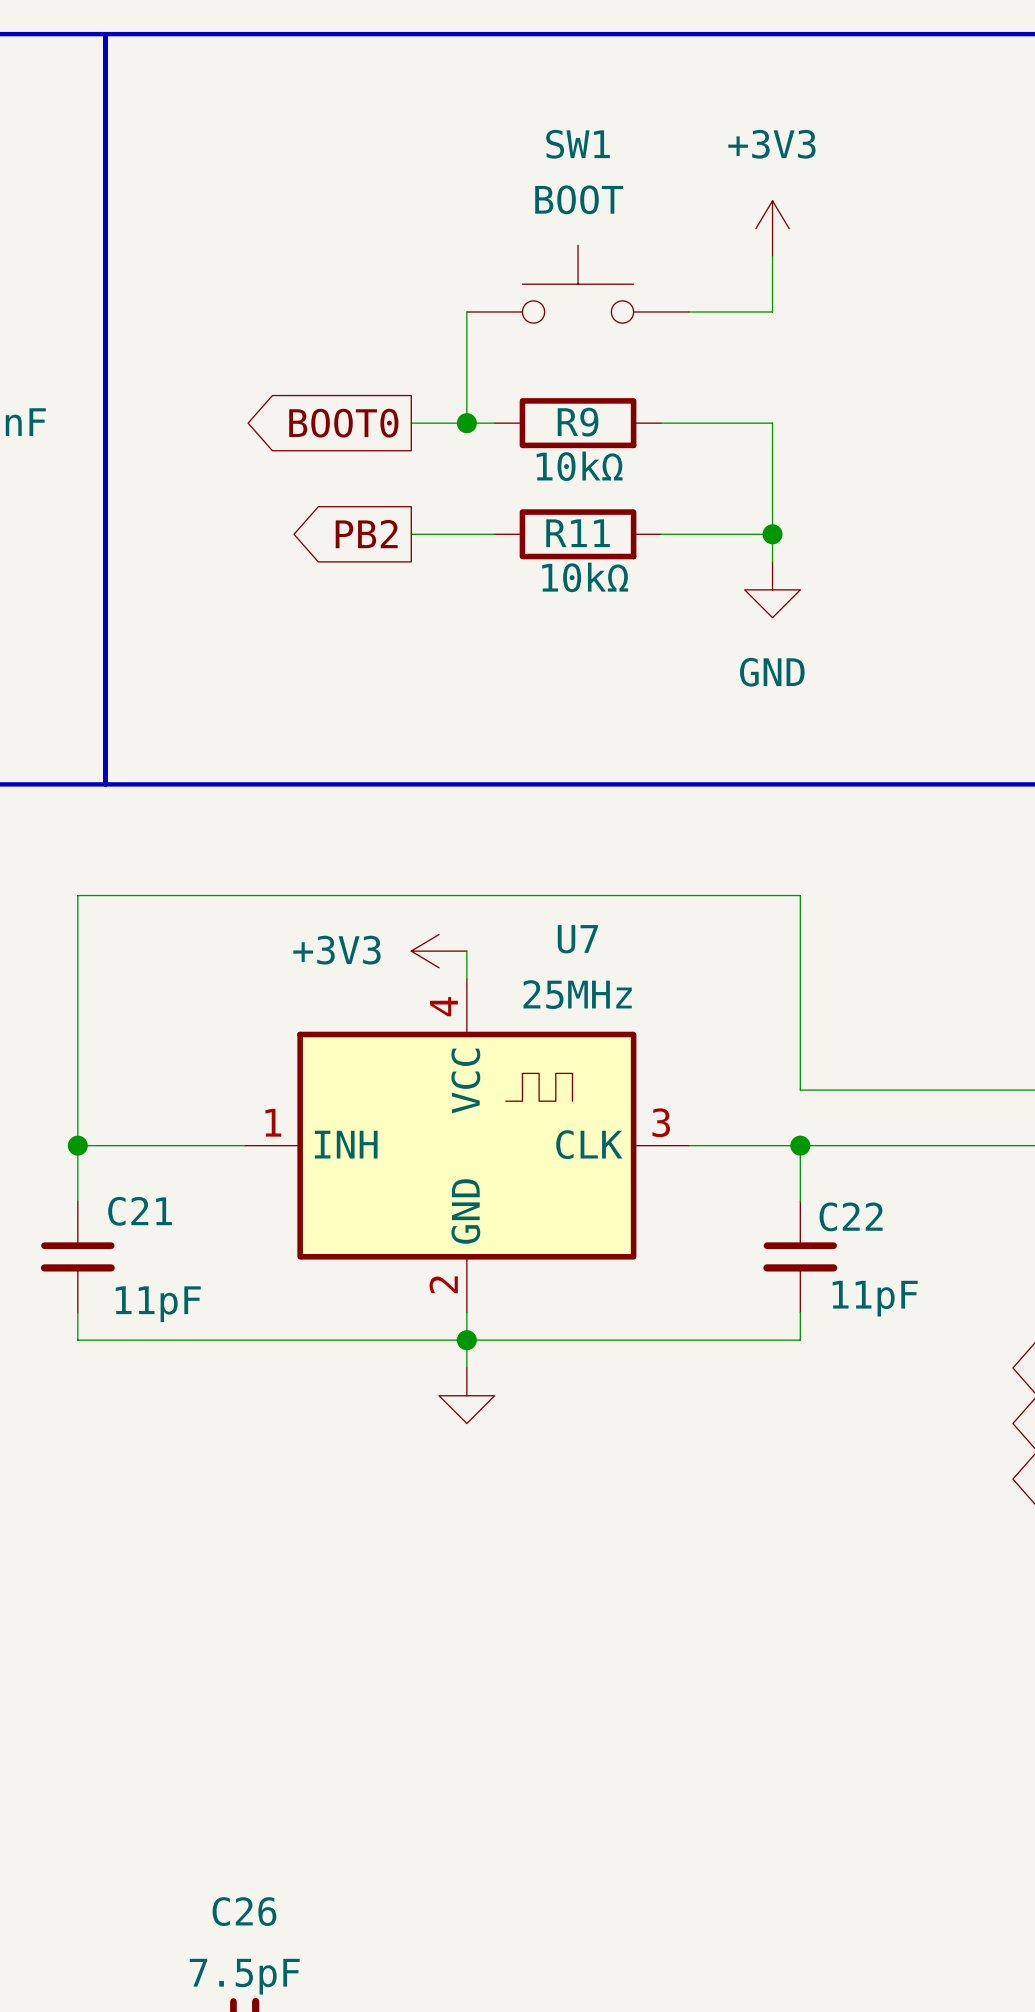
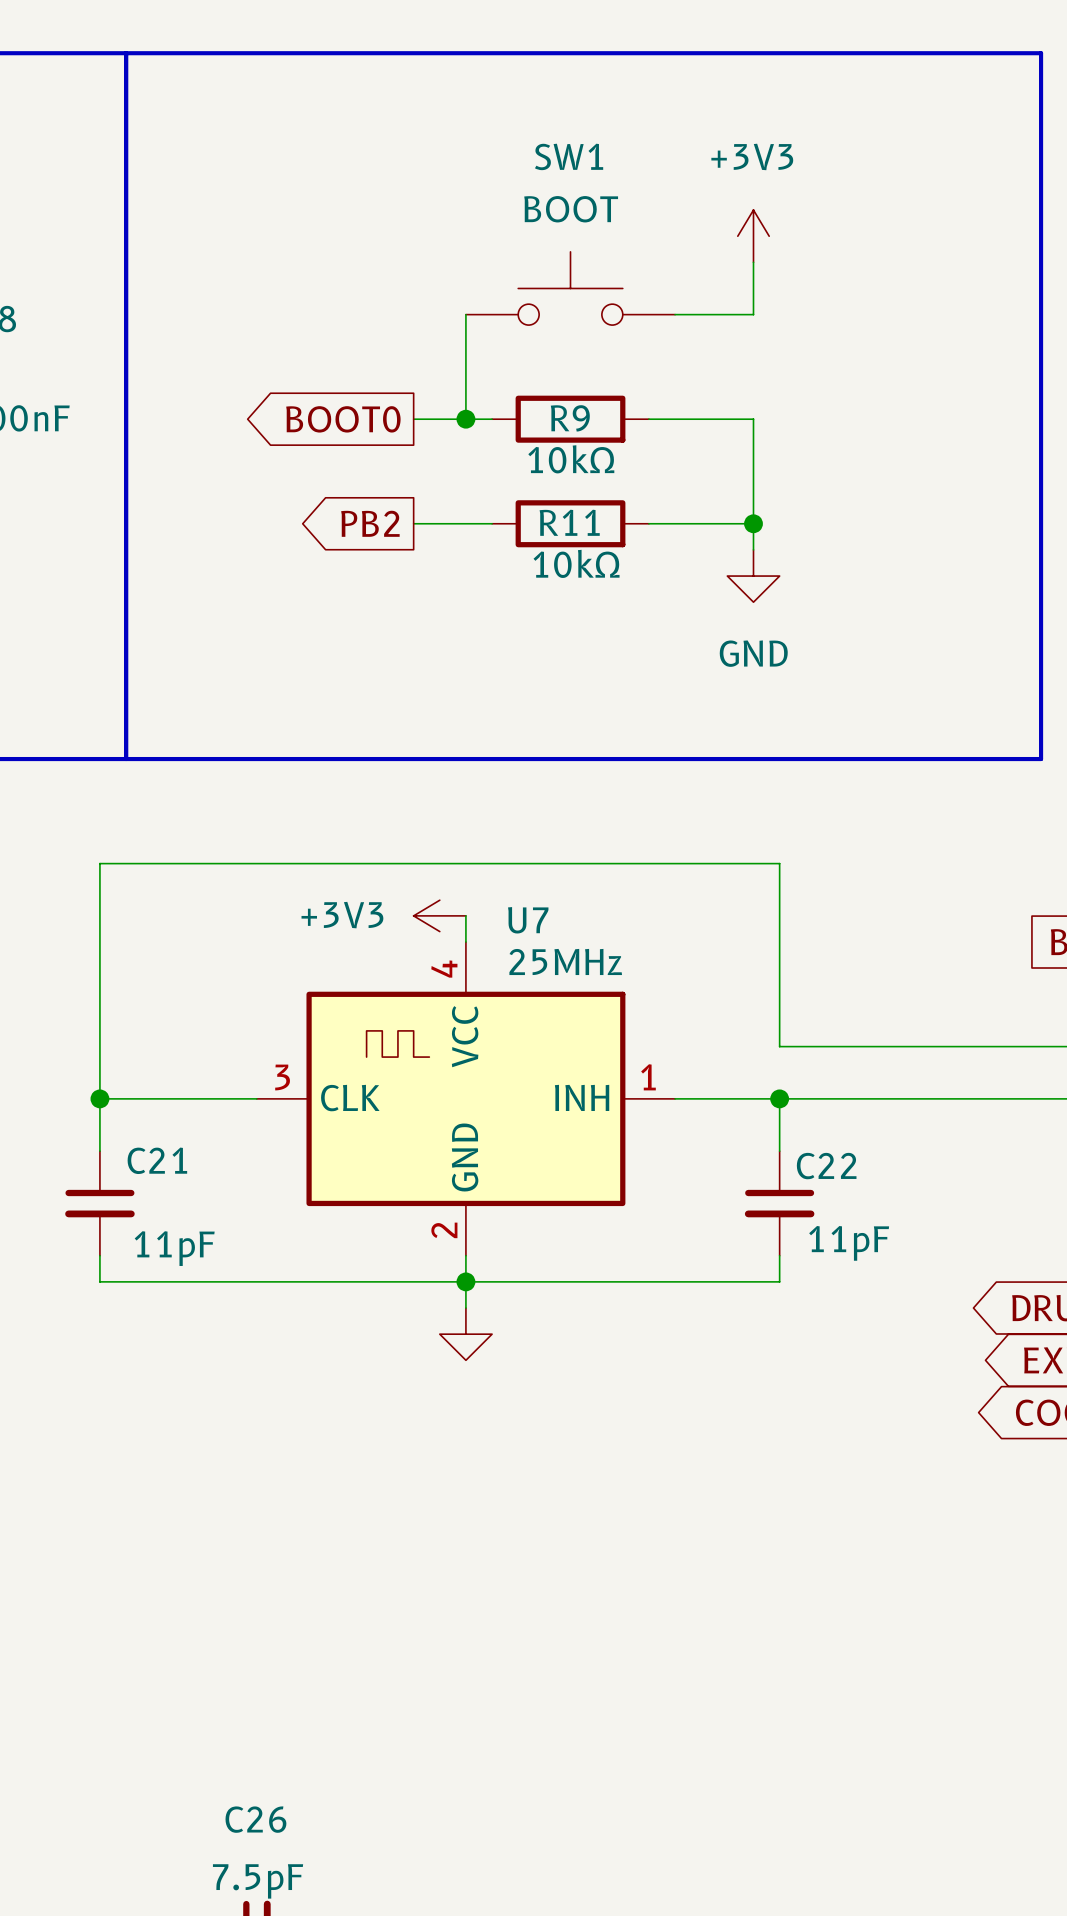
U7 name position: U7 (577, 939) -> U7 (528, 920)
U7 flip: as is (466, 1145) -> left-right (465, 1098)

